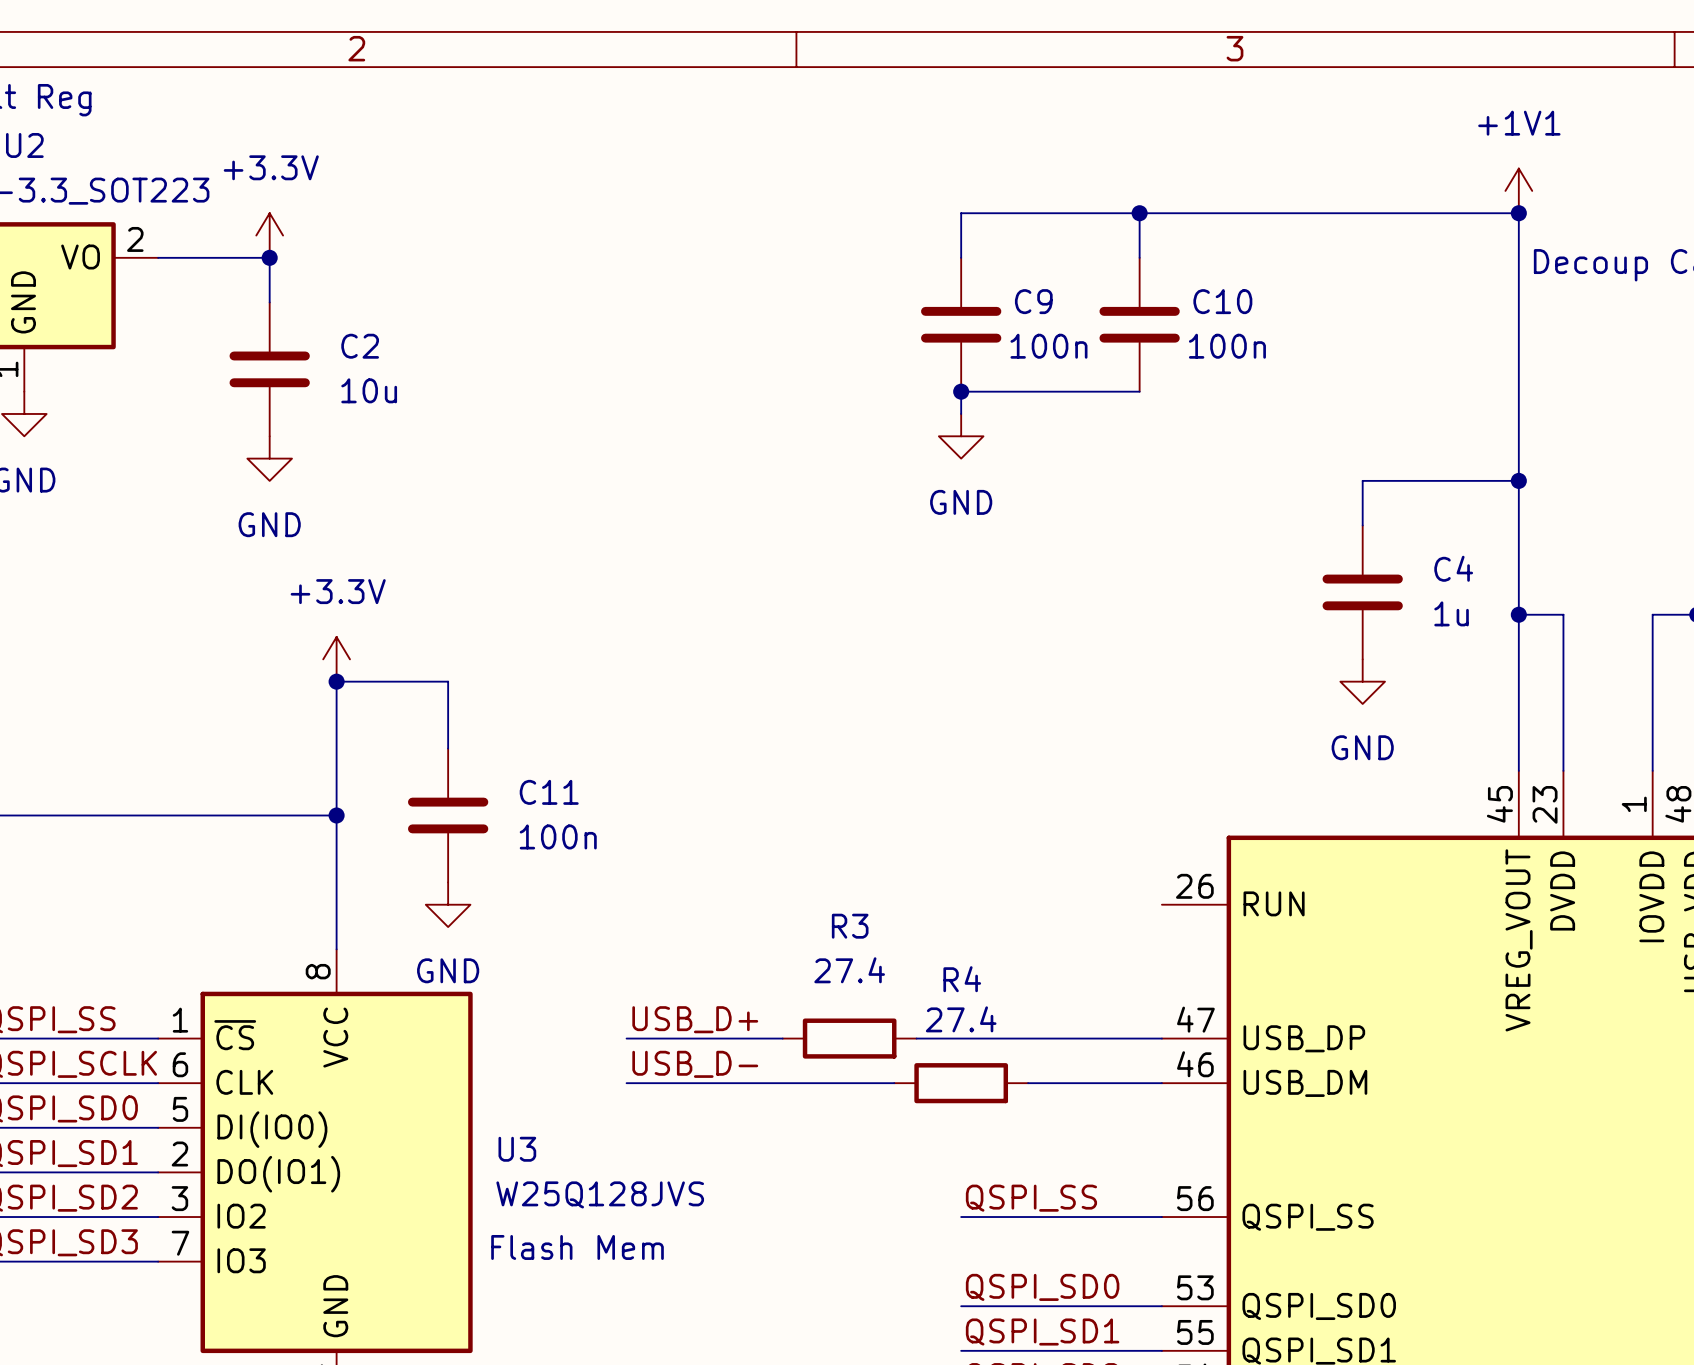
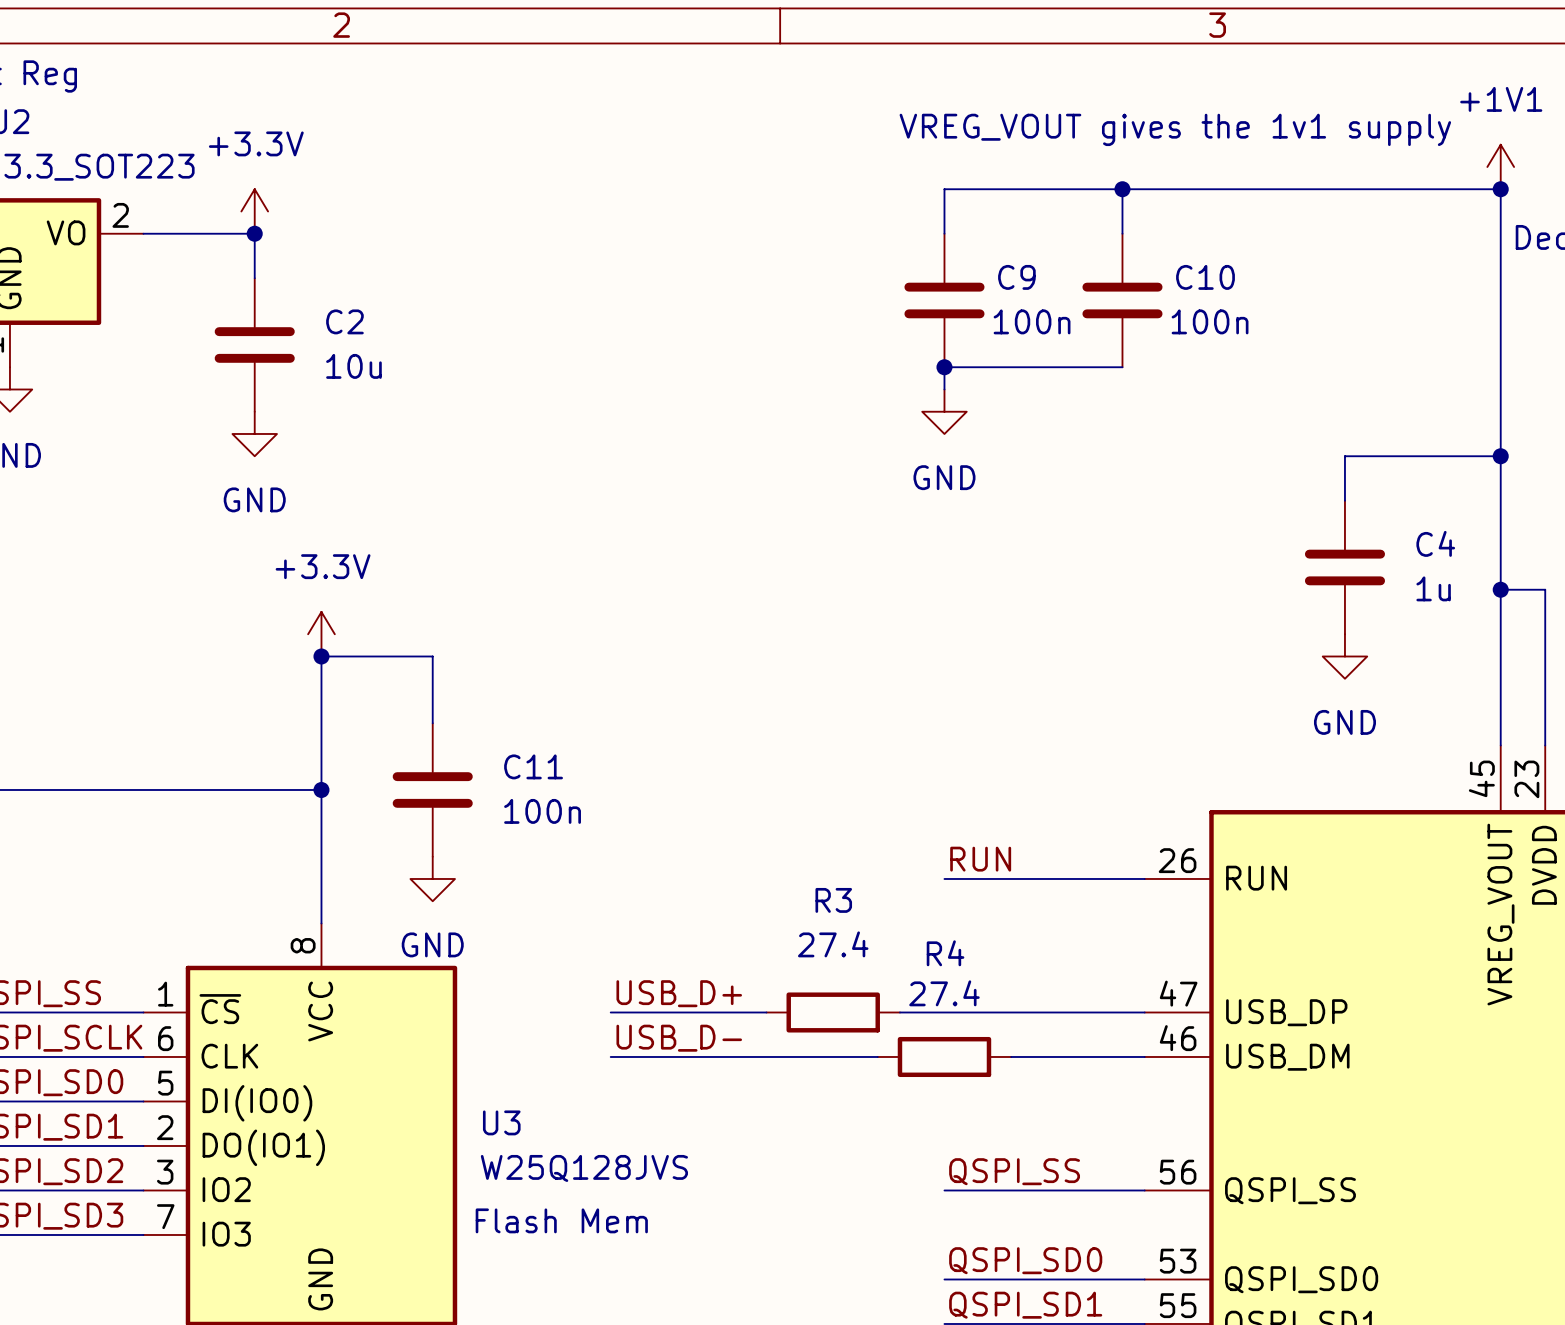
text: none -> VREG_VOUT gives the 1v1 supply (1175, 129)
label: none -> RUN (980, 859)
wire: none -> (944, 878) (1144, 878)

